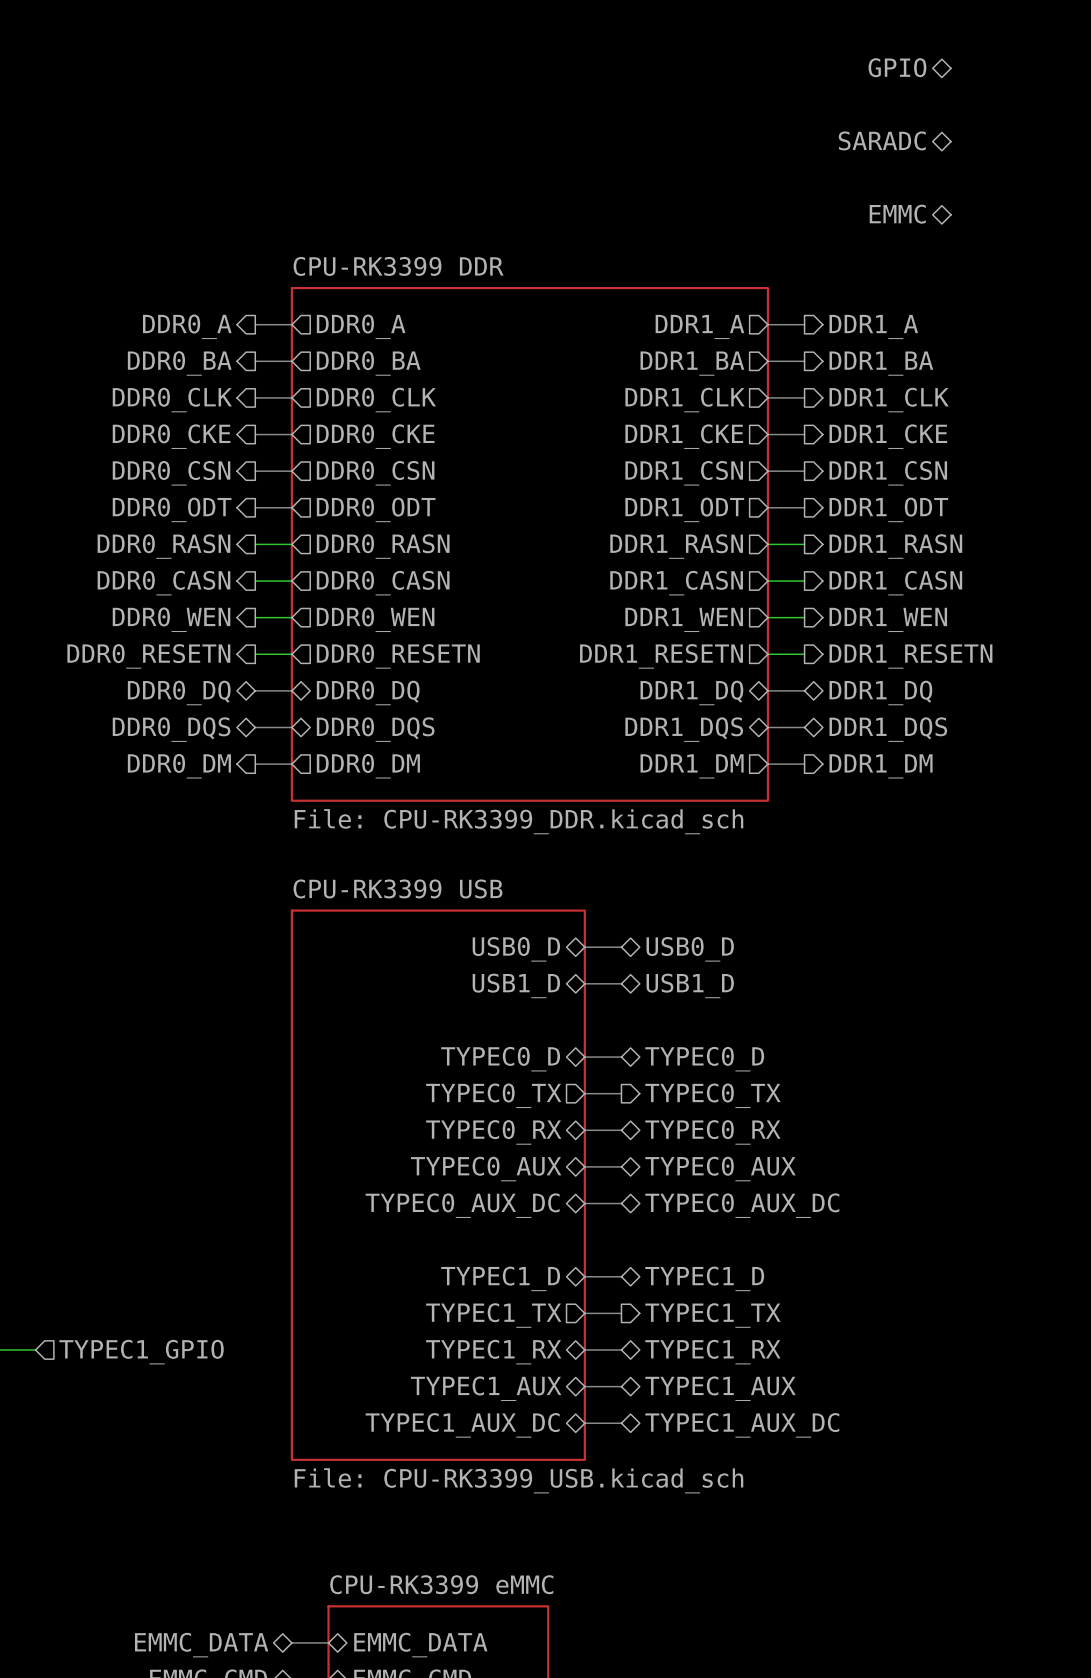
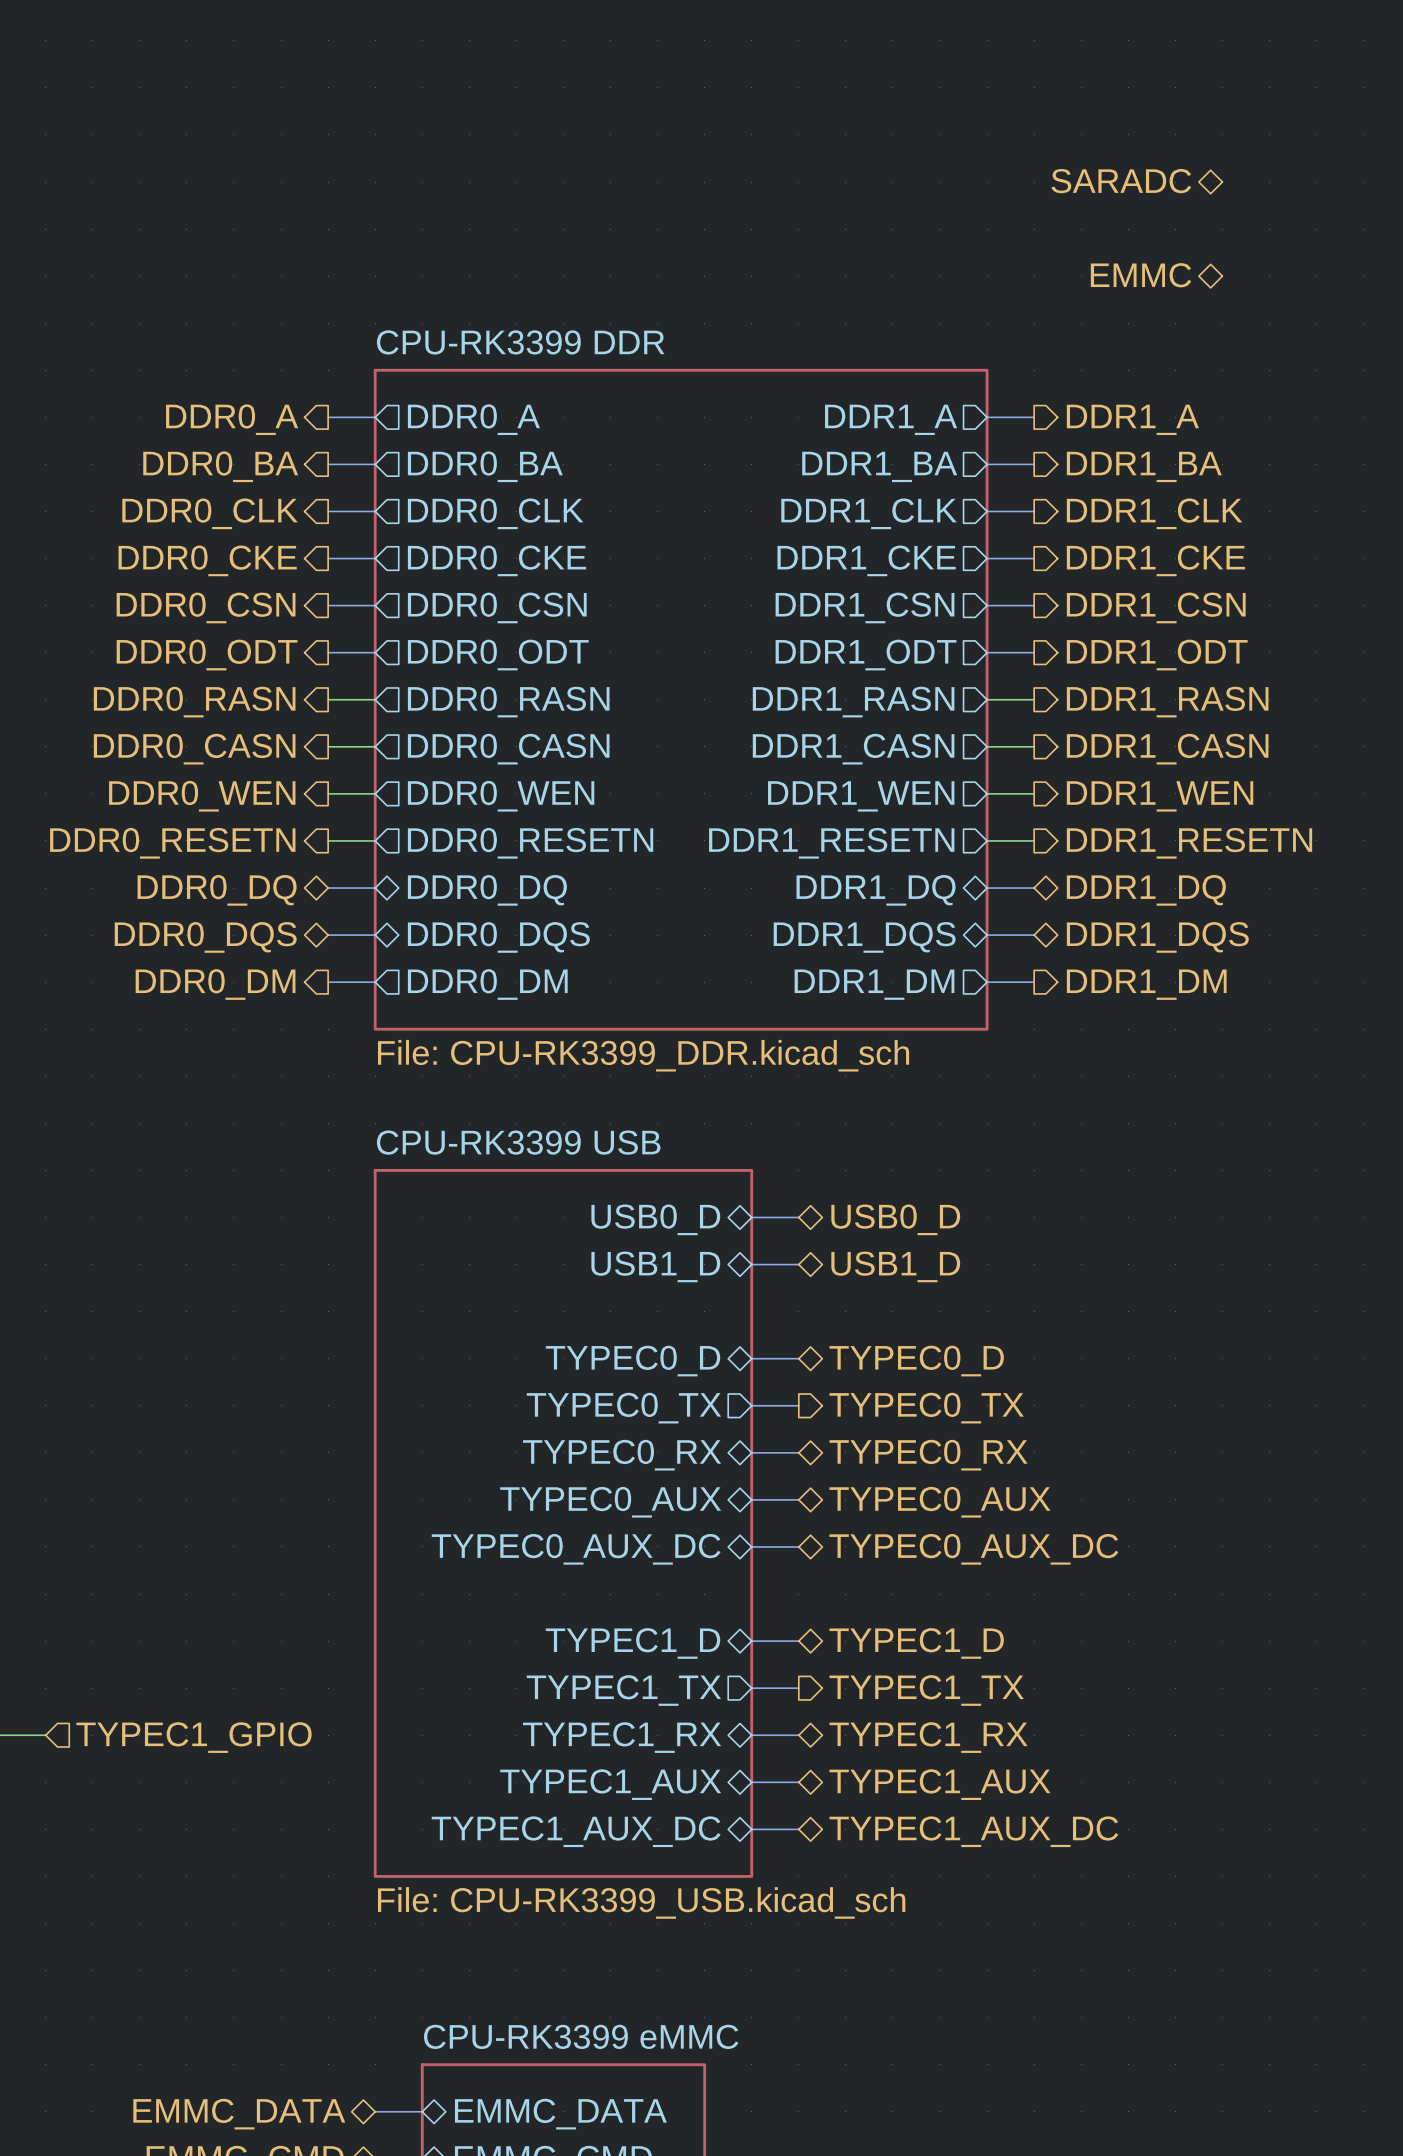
hierarchical label: GPIO (897, 67) -> none

